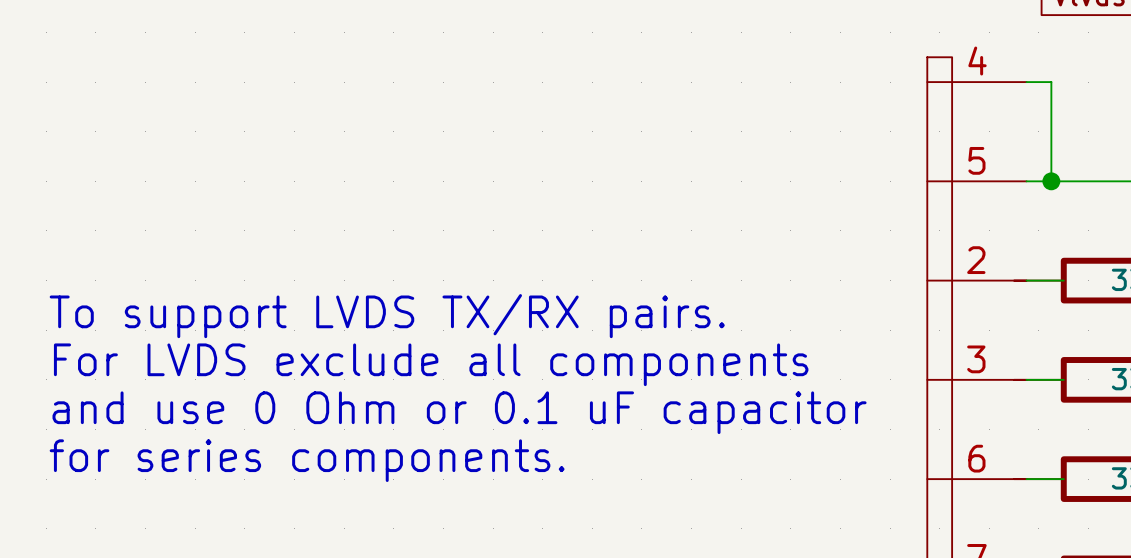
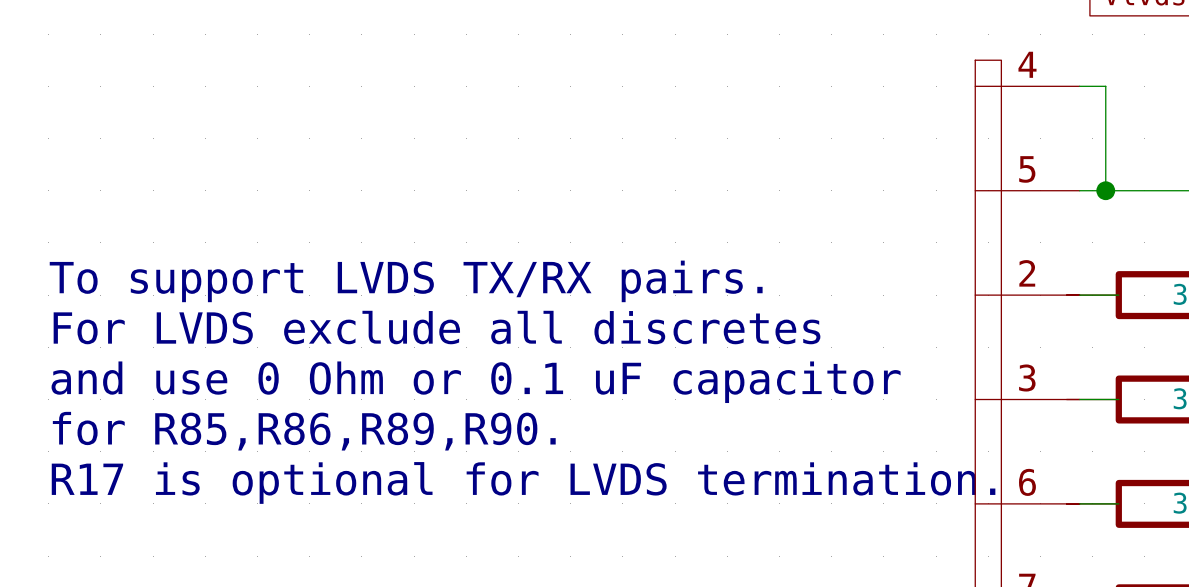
text: none -> To support LVDS TX/RX pairs. (406, 281)
text: To support LVDS TX/RX pairs. (387, 316) -> For LVDS exclude all discretes (437, 327)
text: For LVDS exclude all components (431, 364) -> and use 0 Ohm or 0.1 uF capacitor (476, 382)
text: and use 0 Ohm or 0.1 uF capacitor (459, 412) -> for R85,R86,R89,R90. (304, 431)
text: for series components. (307, 460) -> R17 is optional for LVDS termination. (523, 482)

